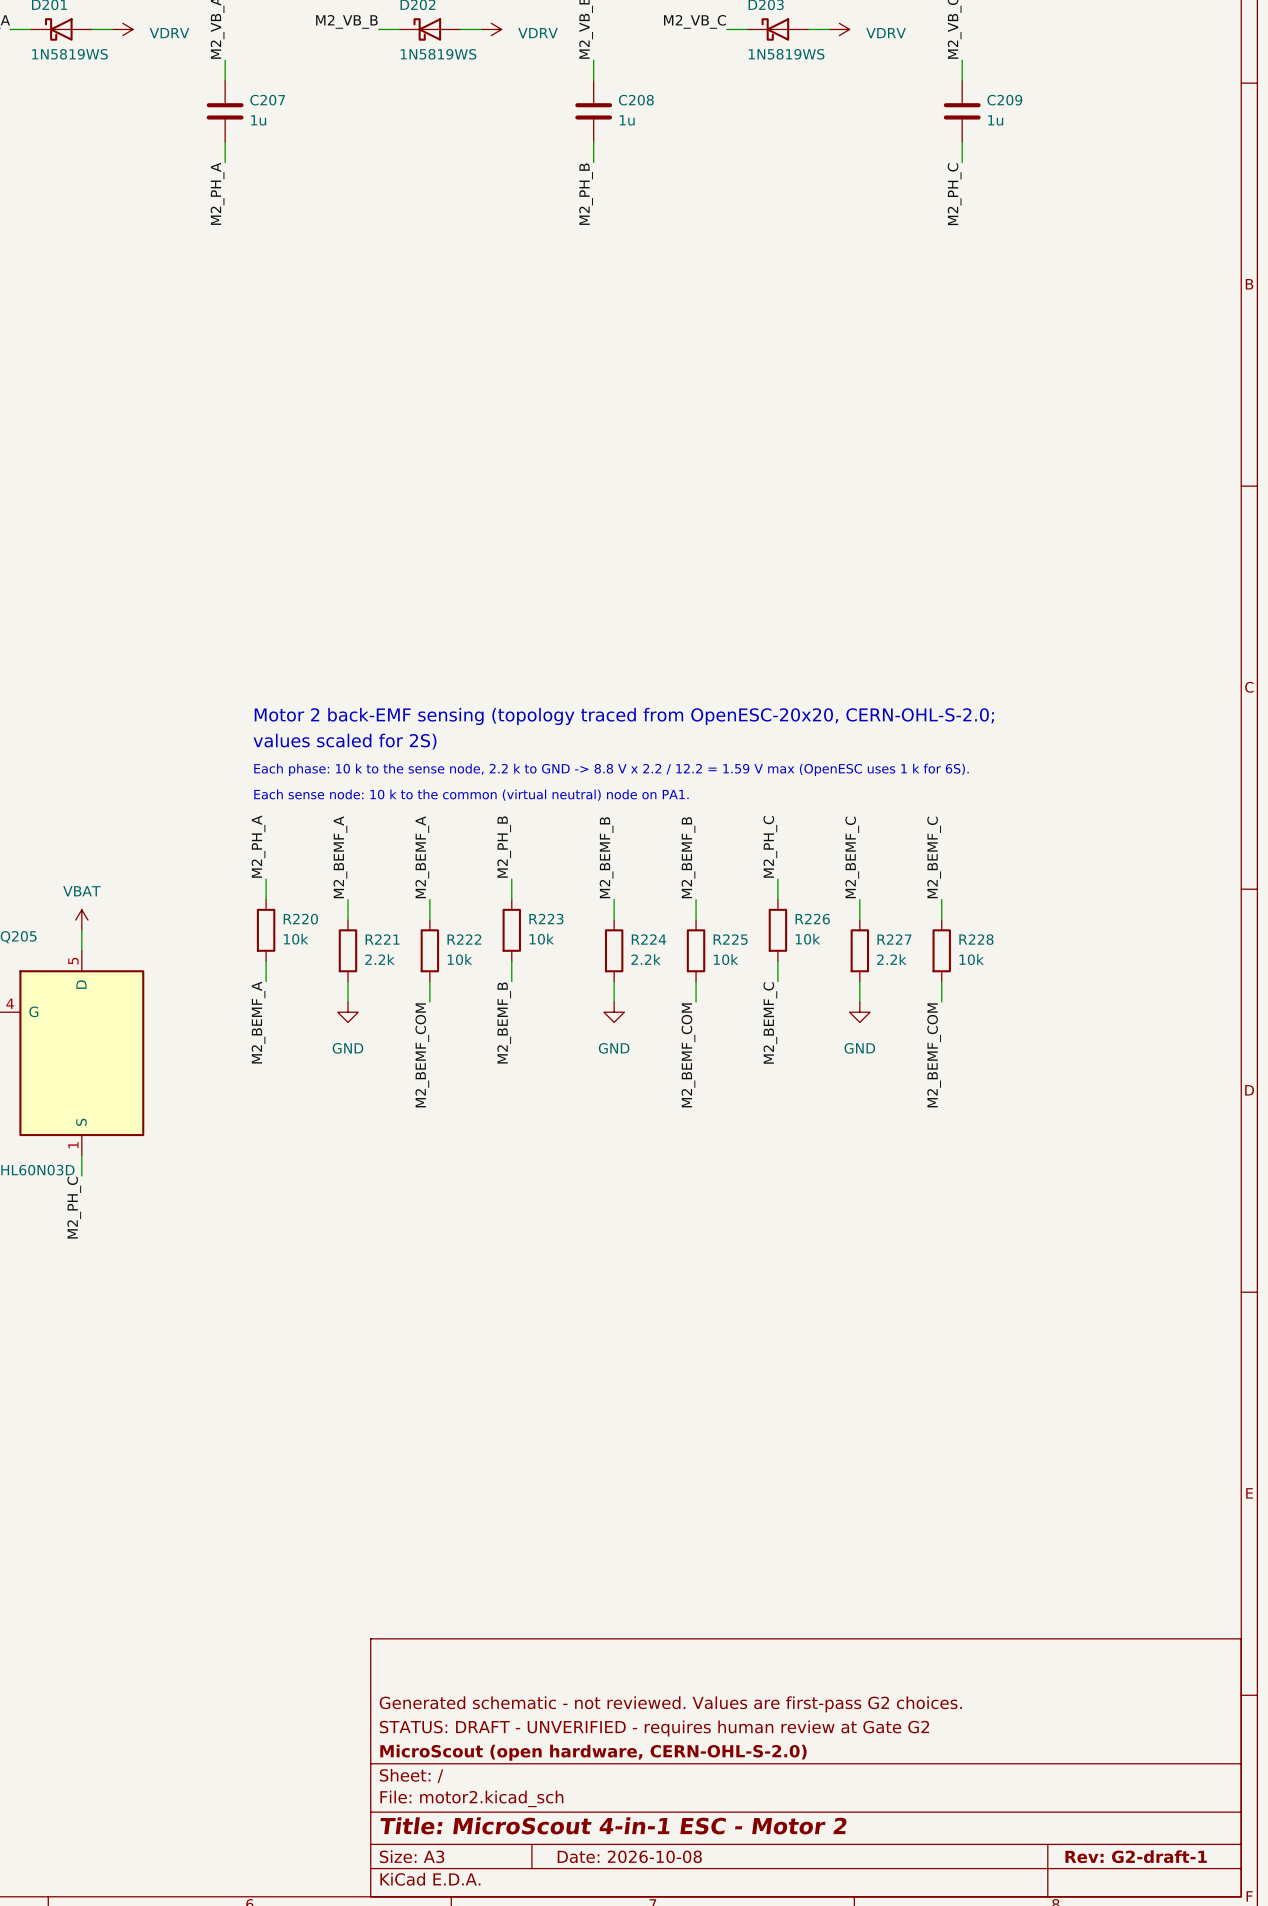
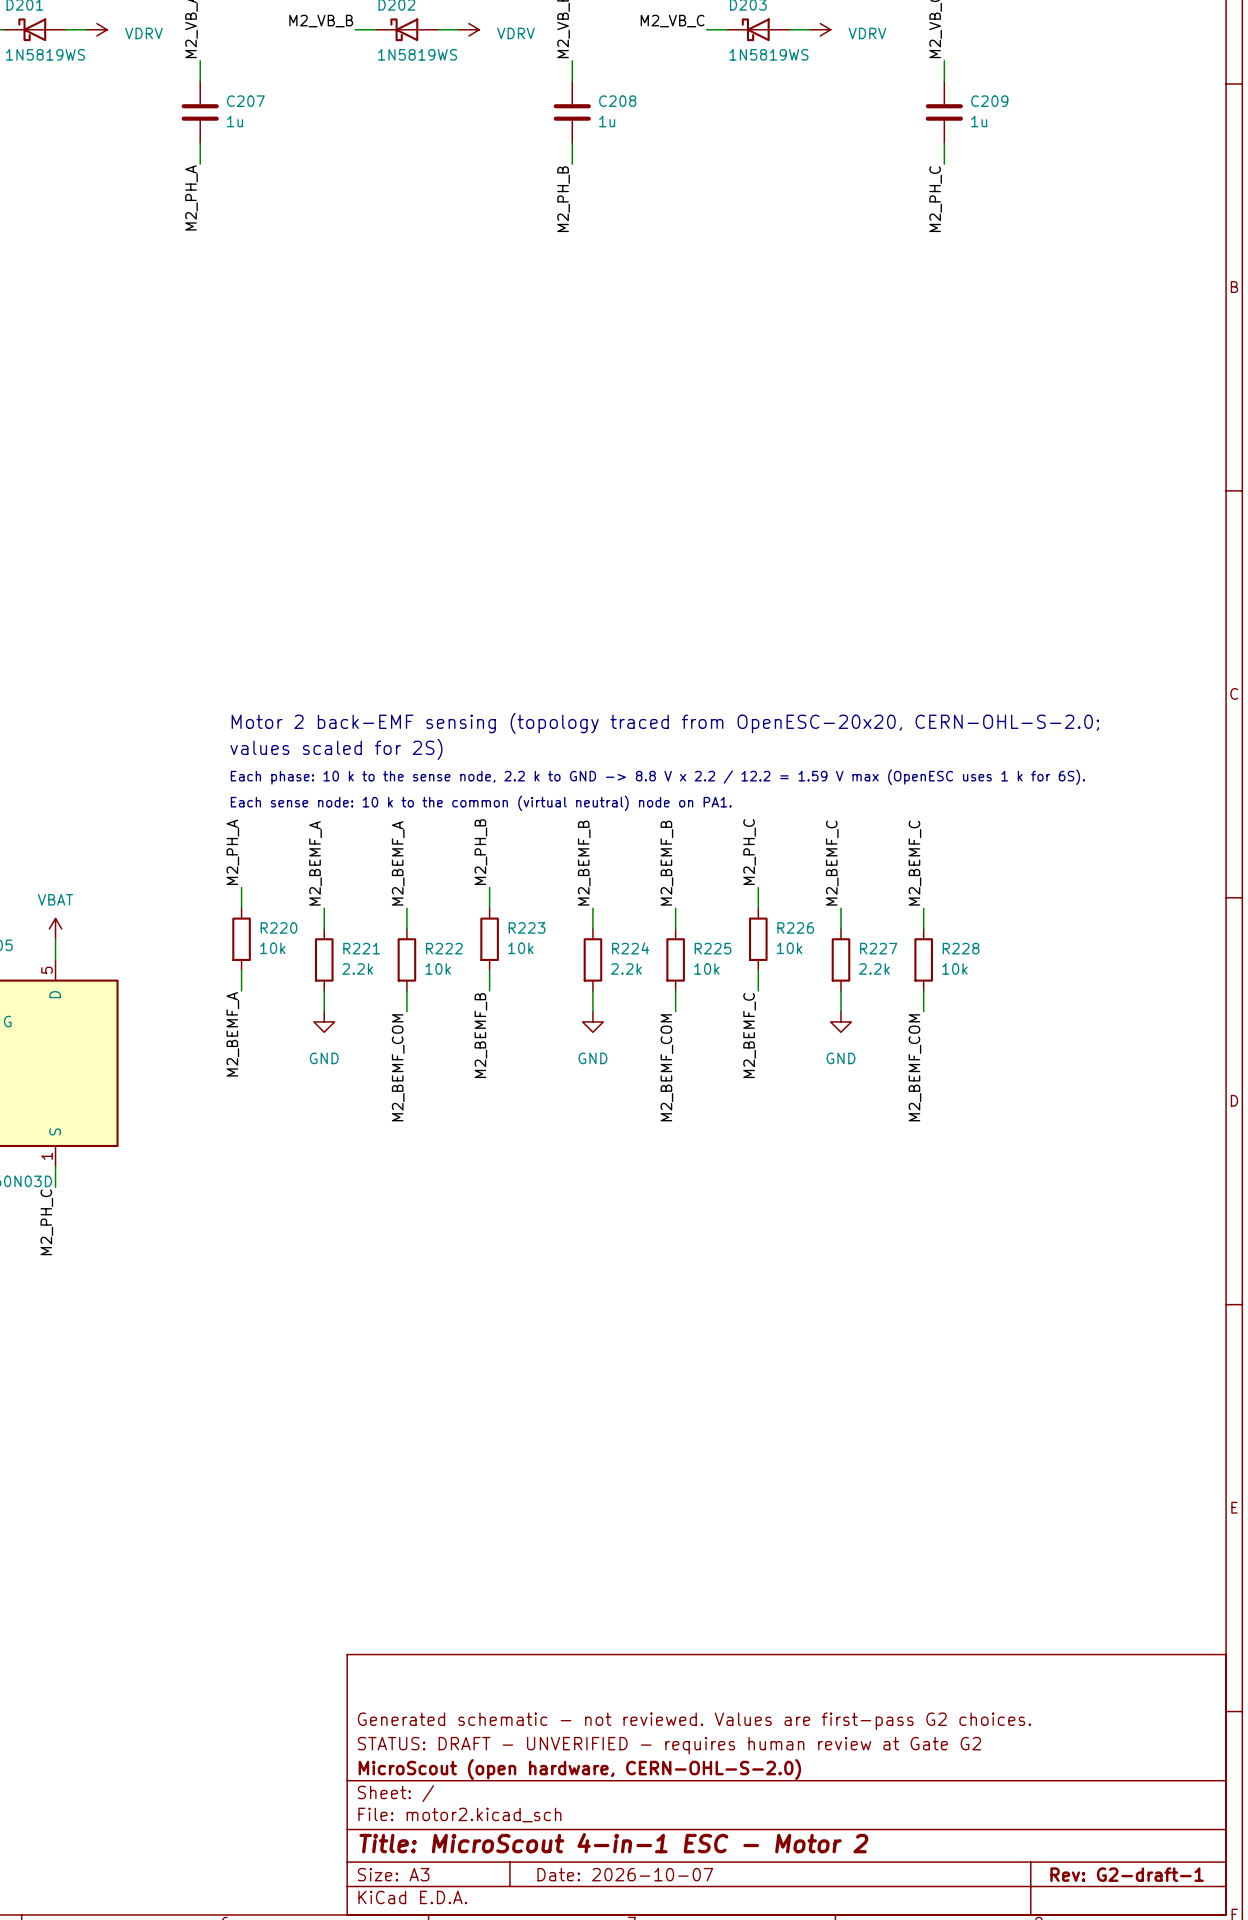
title block: Date: 2026-10-08 (629, 1856) -> Date: 2026-10-07 (625, 1874)

